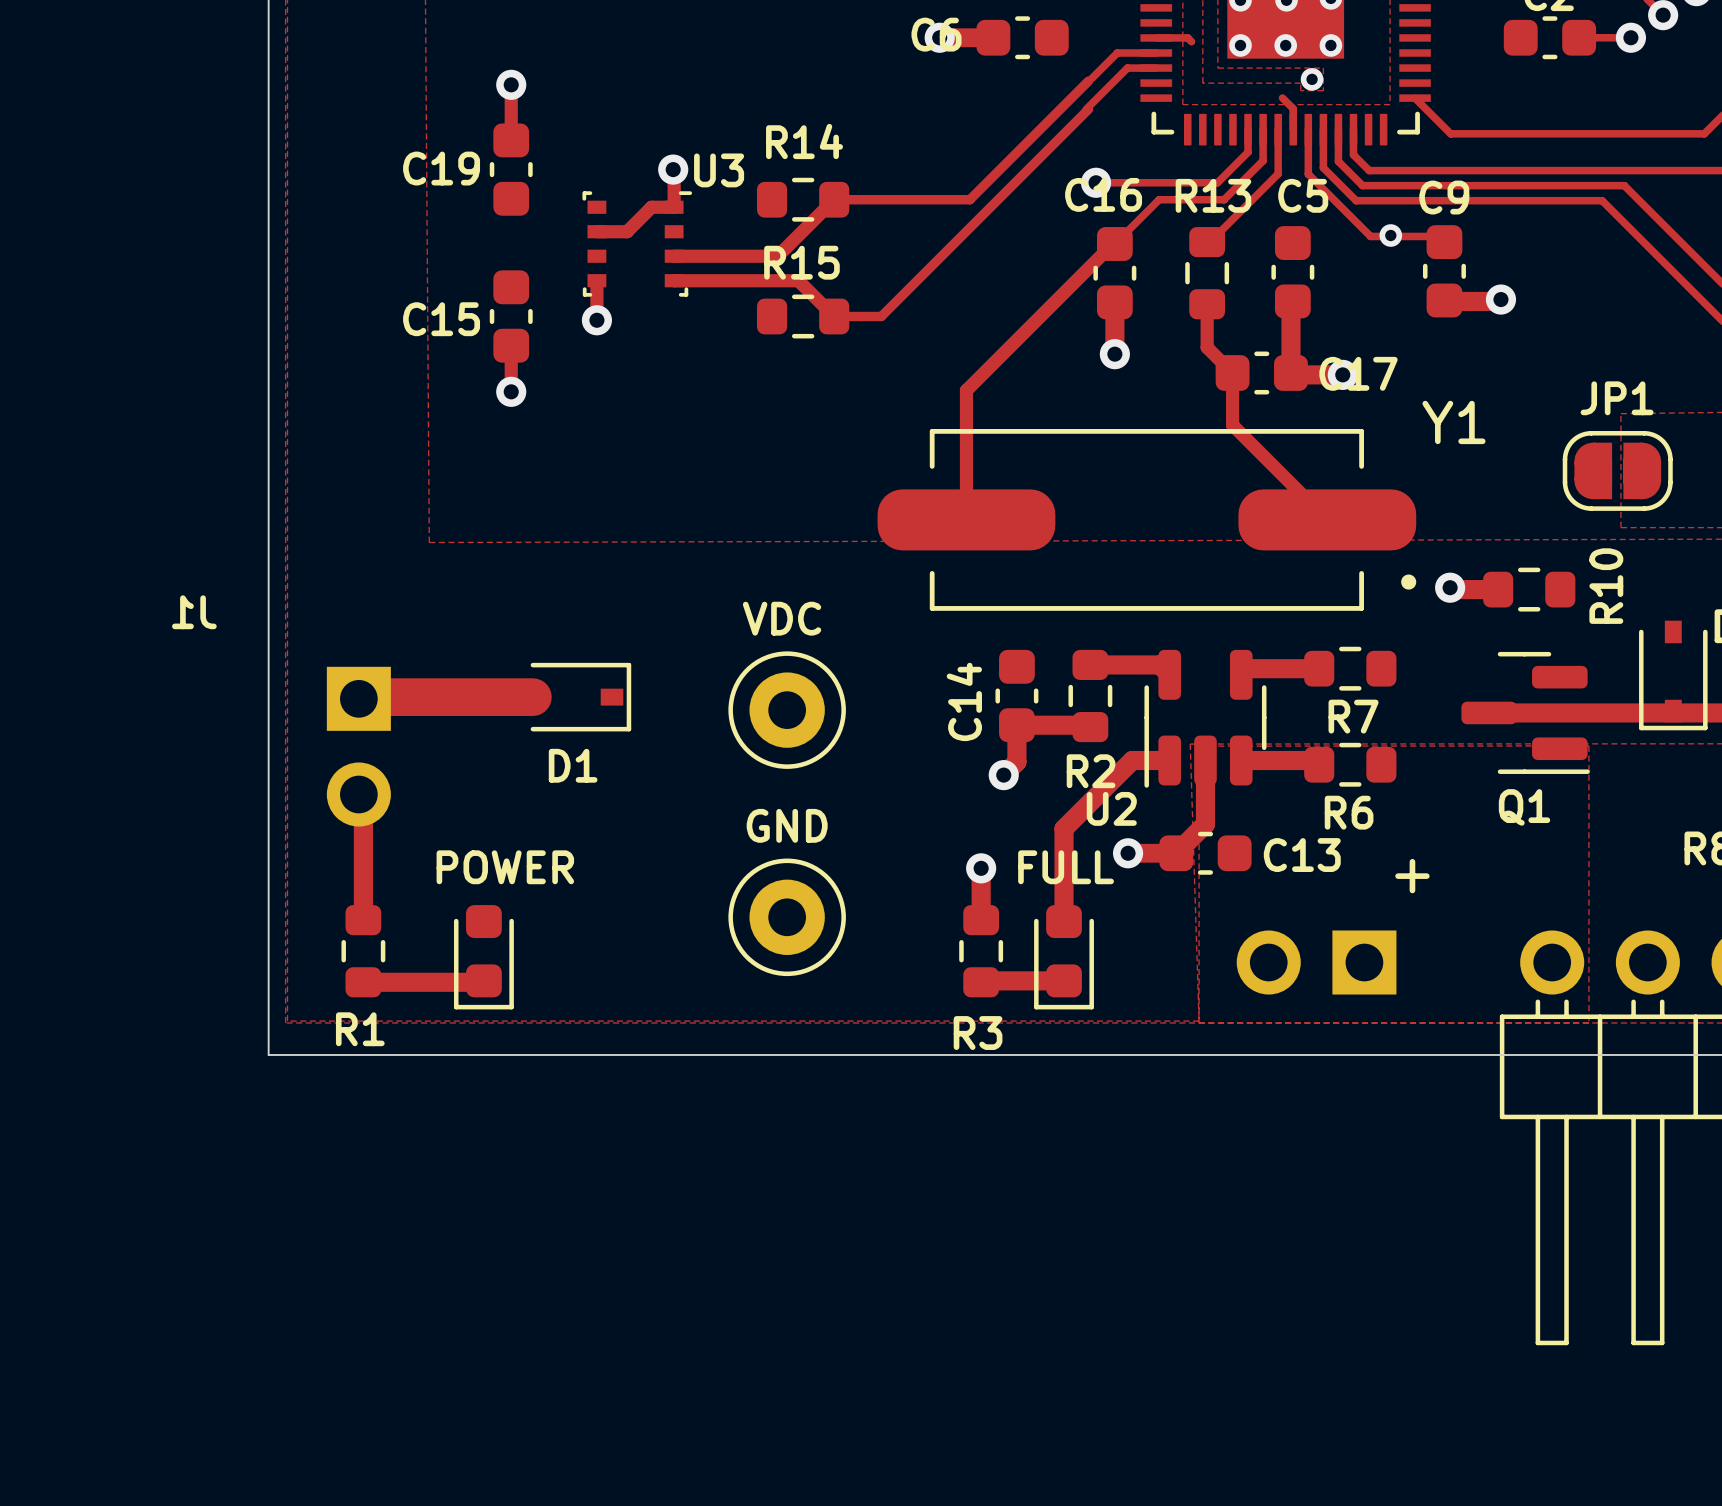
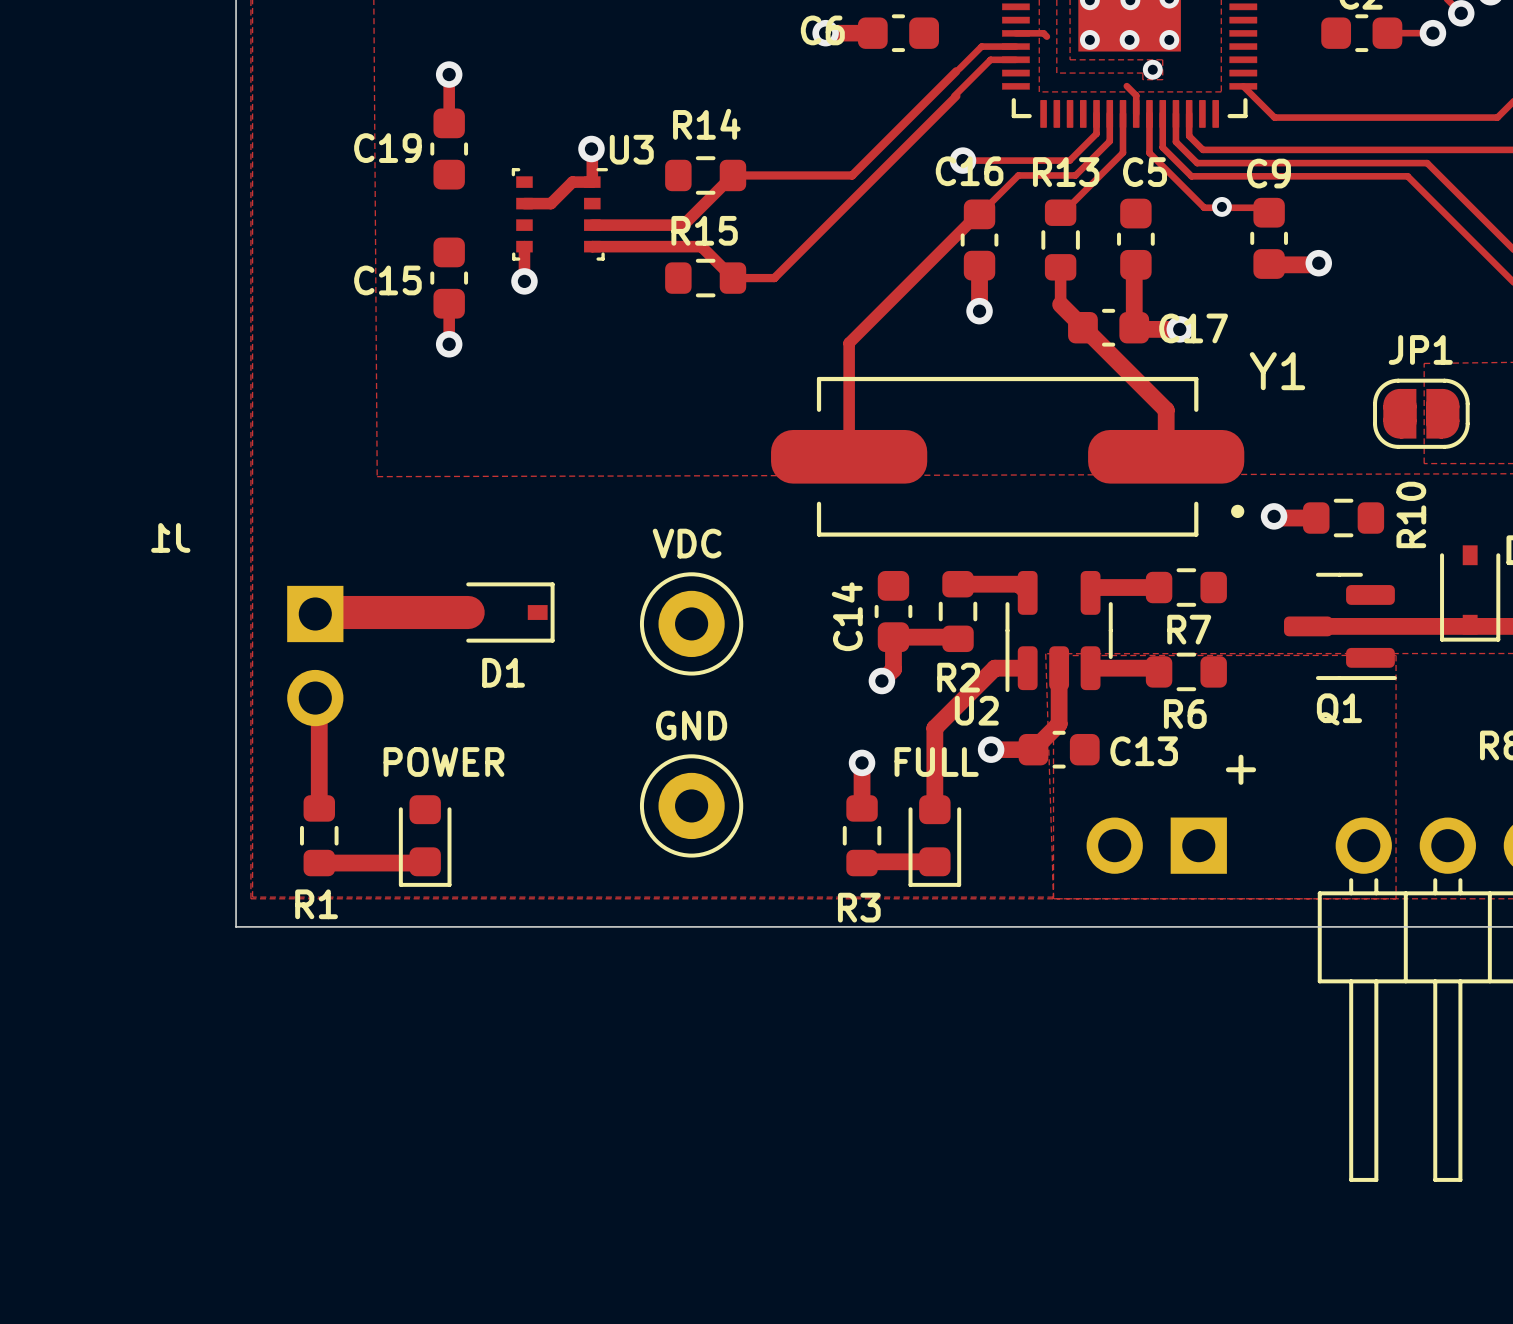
track: (1207, 346) (1232, 373) (1232, 425) (1327, 519) -> (1060, 304) (1166, 410) (1166, 438)

